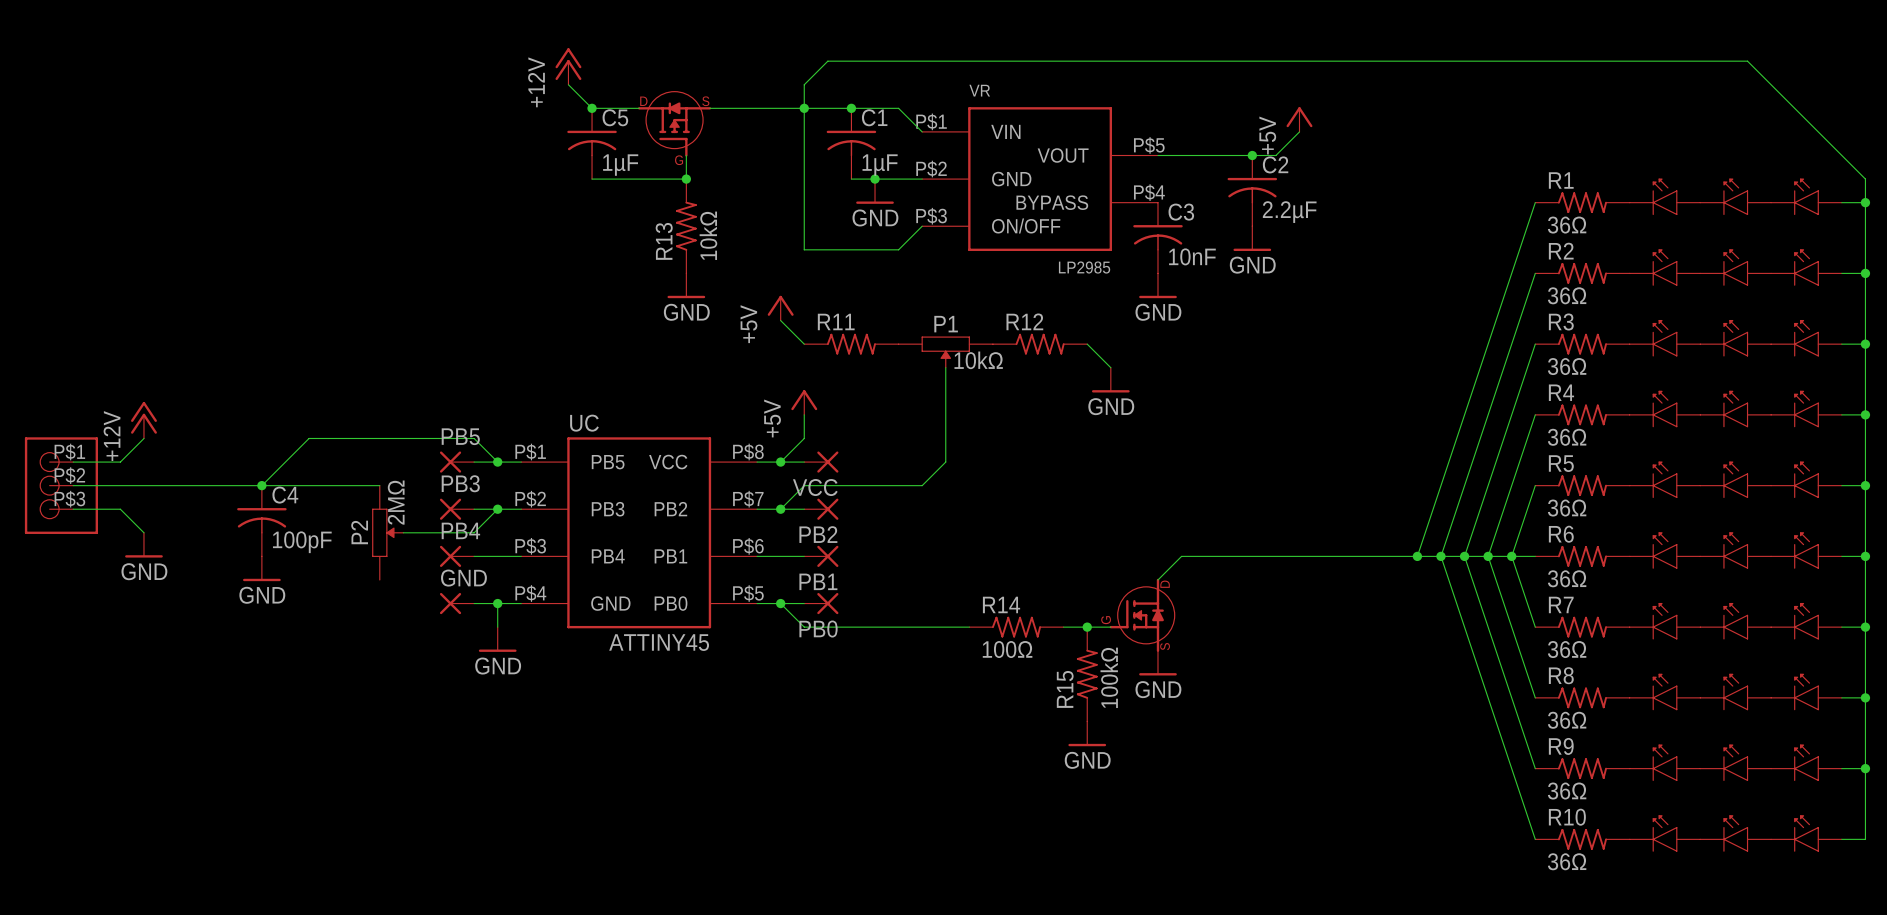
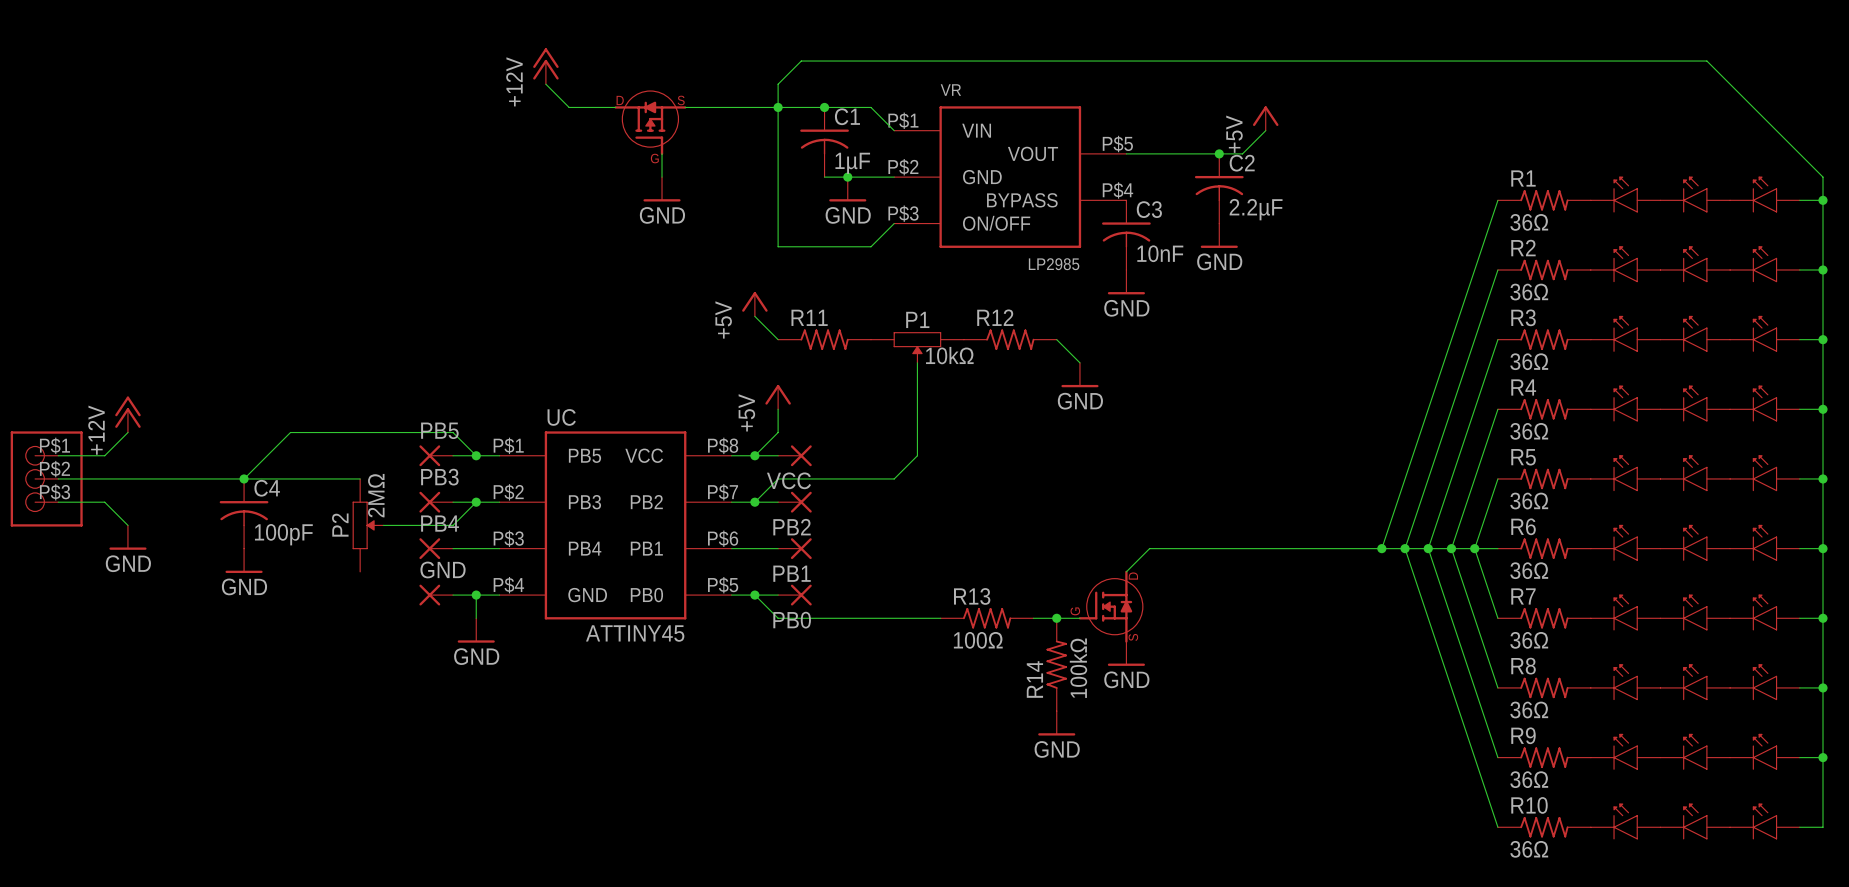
junction: (592, 108) -> none
C5: 1µF (592, 143) -> none
wire: (592, 179) (686, 179) -> none
junction: (686, 179) -> none
R13: 10kΩ (686, 226) -> none
power symbol position: GND (686, 285) -> GND (662, 189)
R14 name: R14 (1001, 604) -> R13 (972, 596)
R15 name: R15 (1065, 689) -> R14 (1034, 679)

